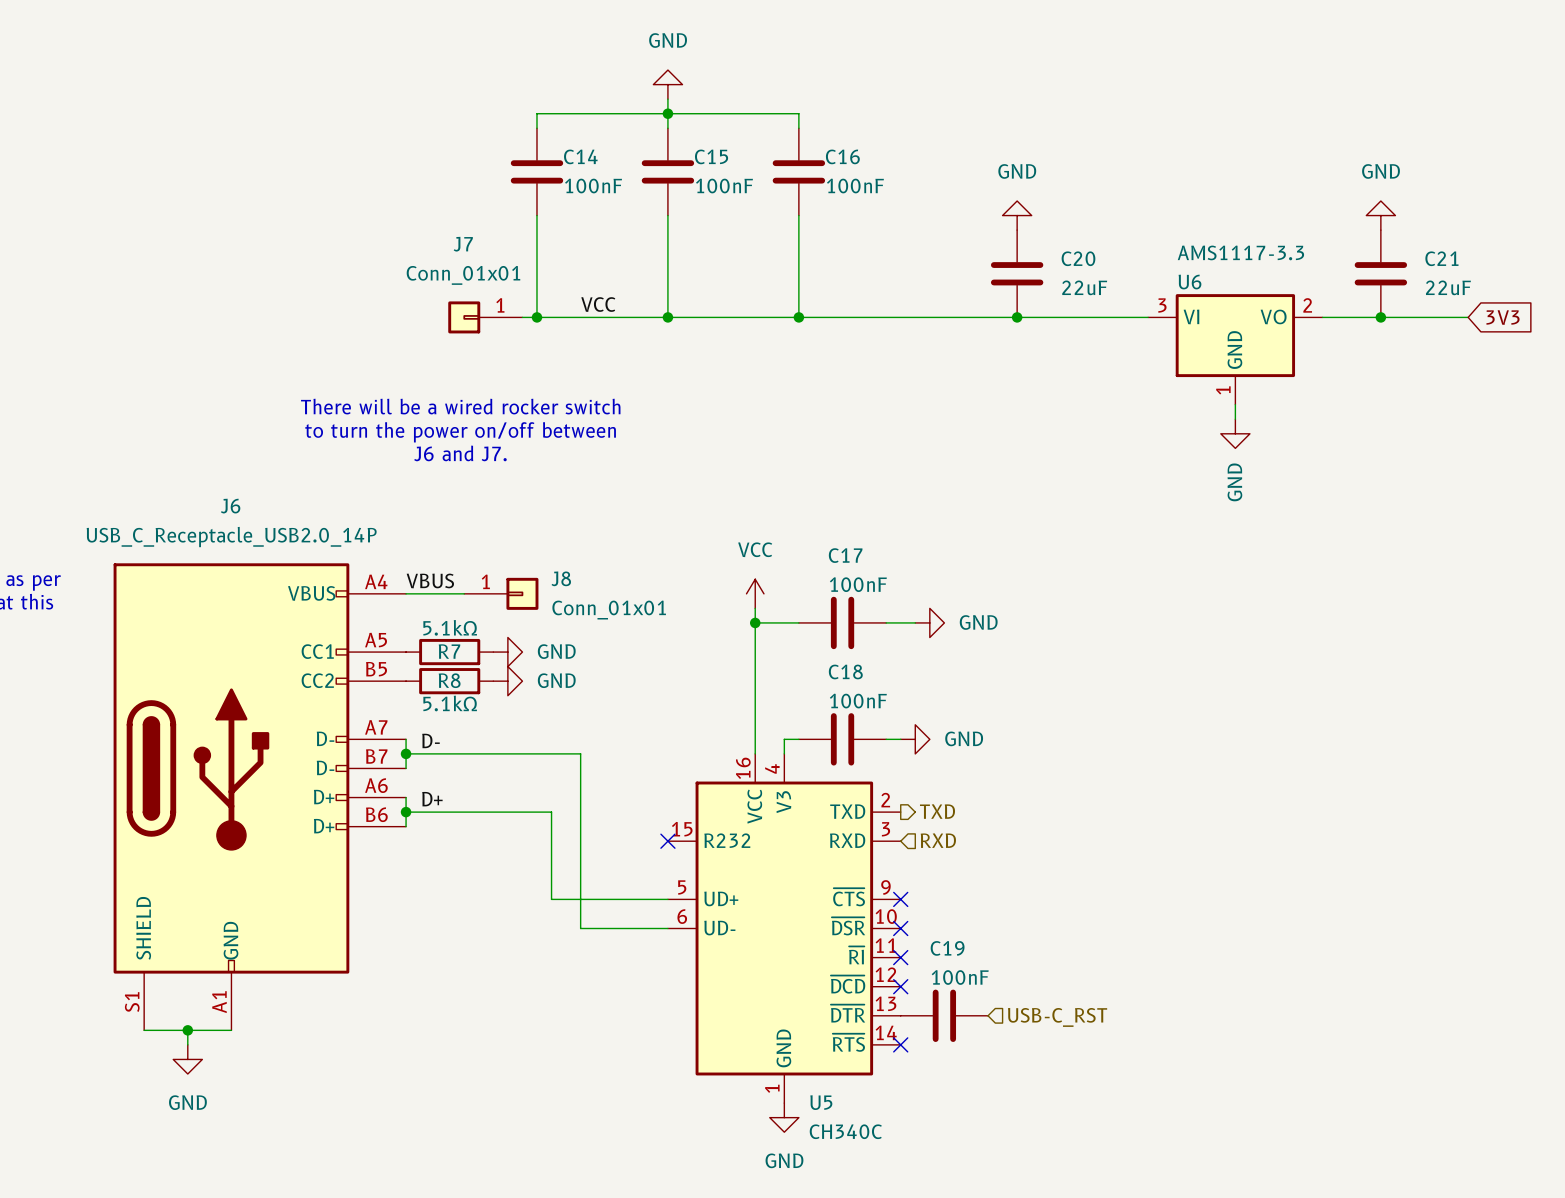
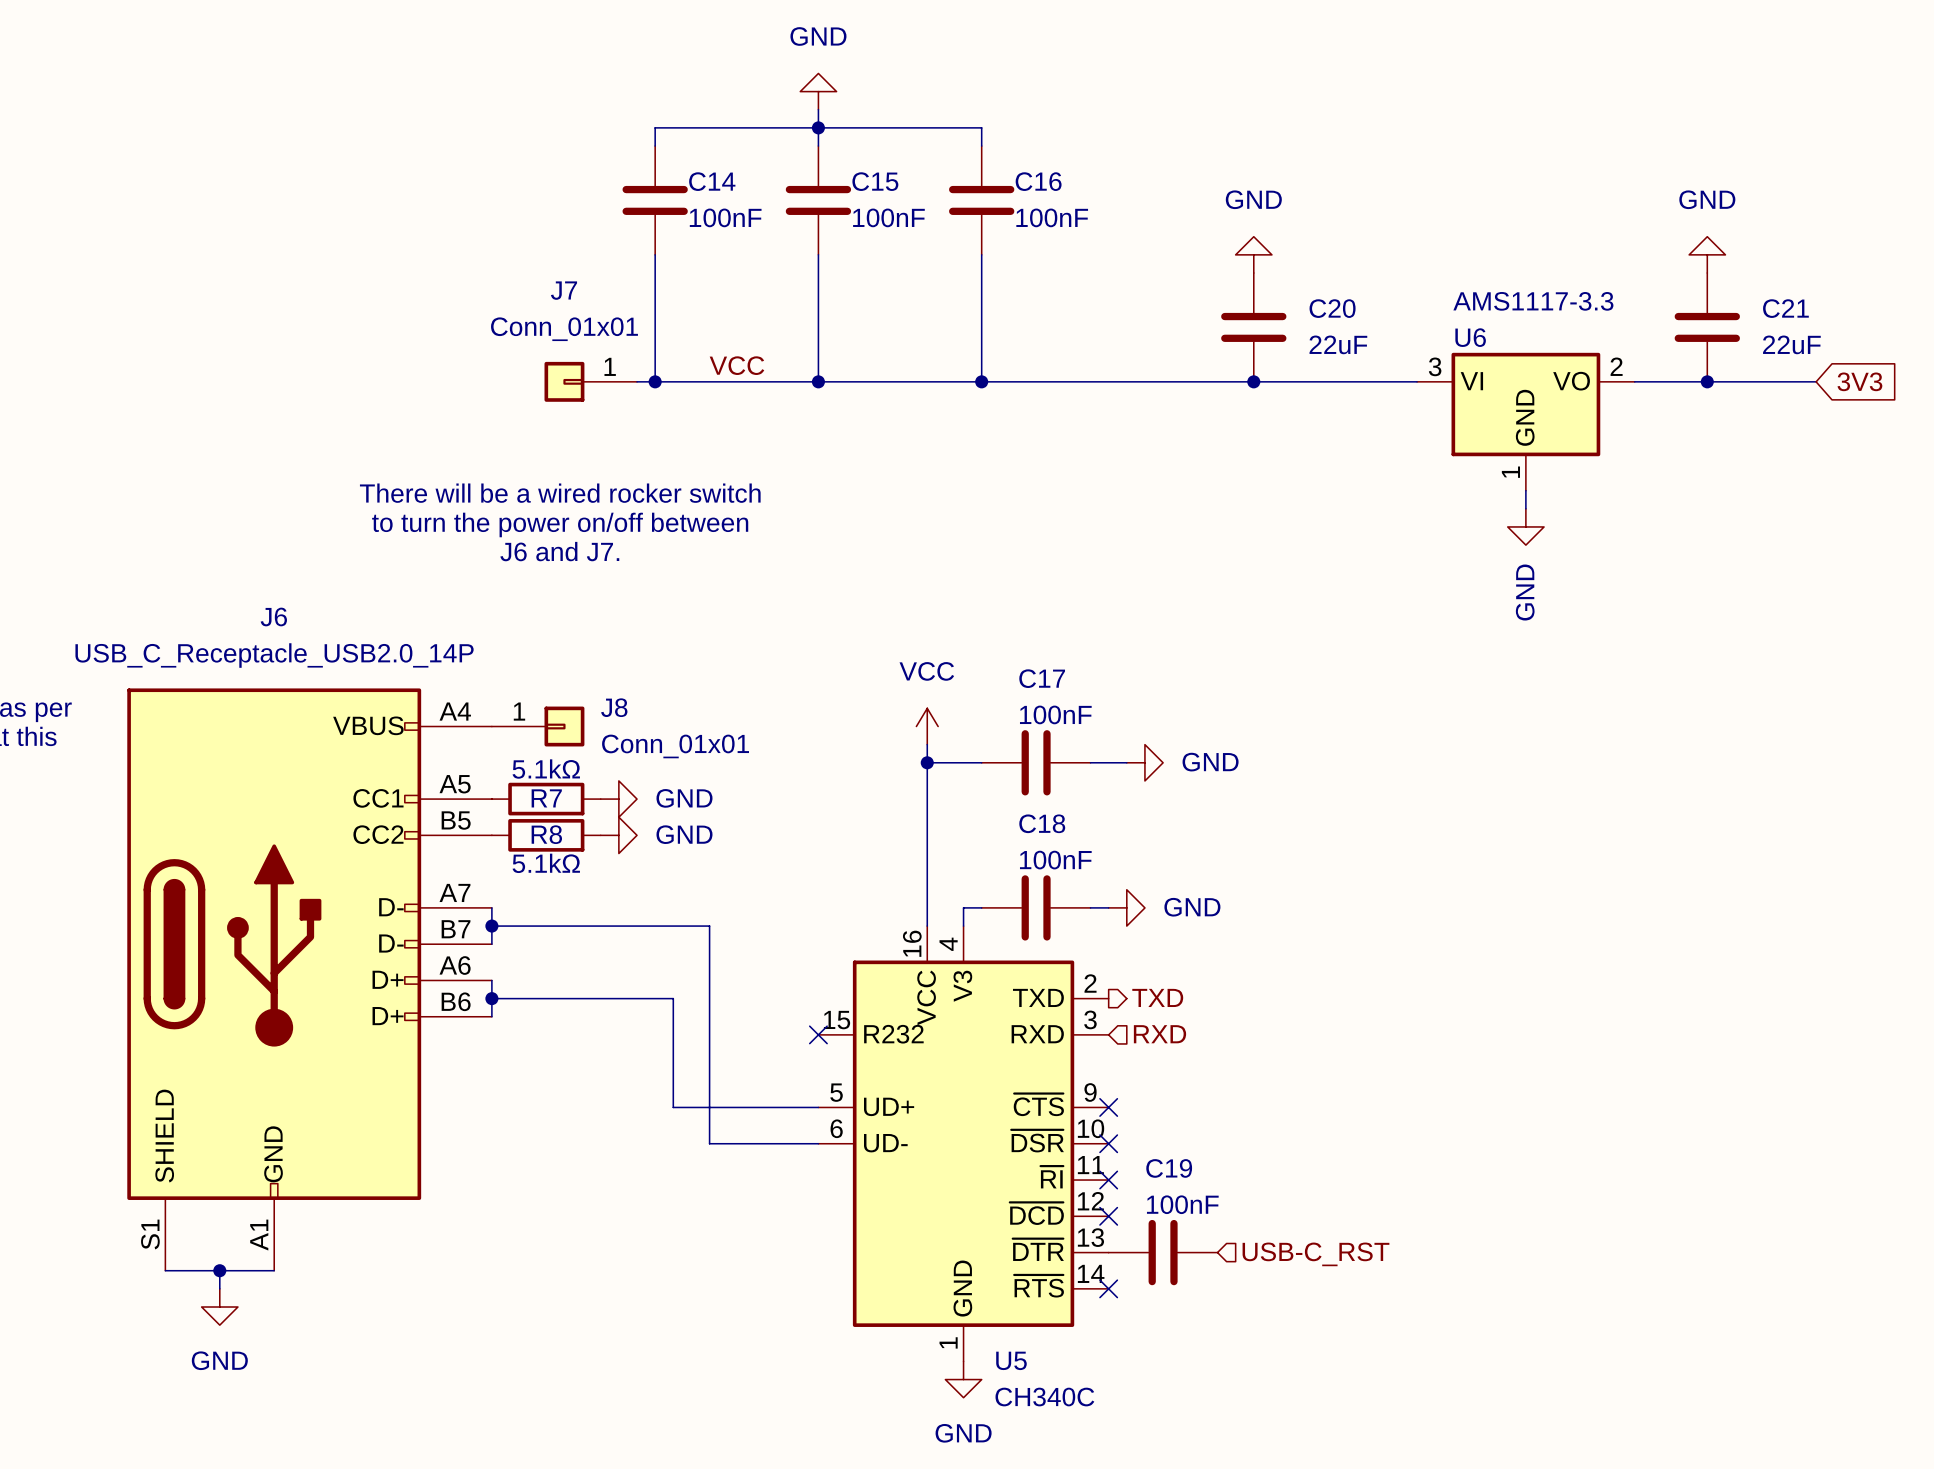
label: VBUS (430, 580) -> none
J8 position: (501, 593) -> (538, 726)
label: D- (430, 740) -> none
label: D+ (432, 799) -> none

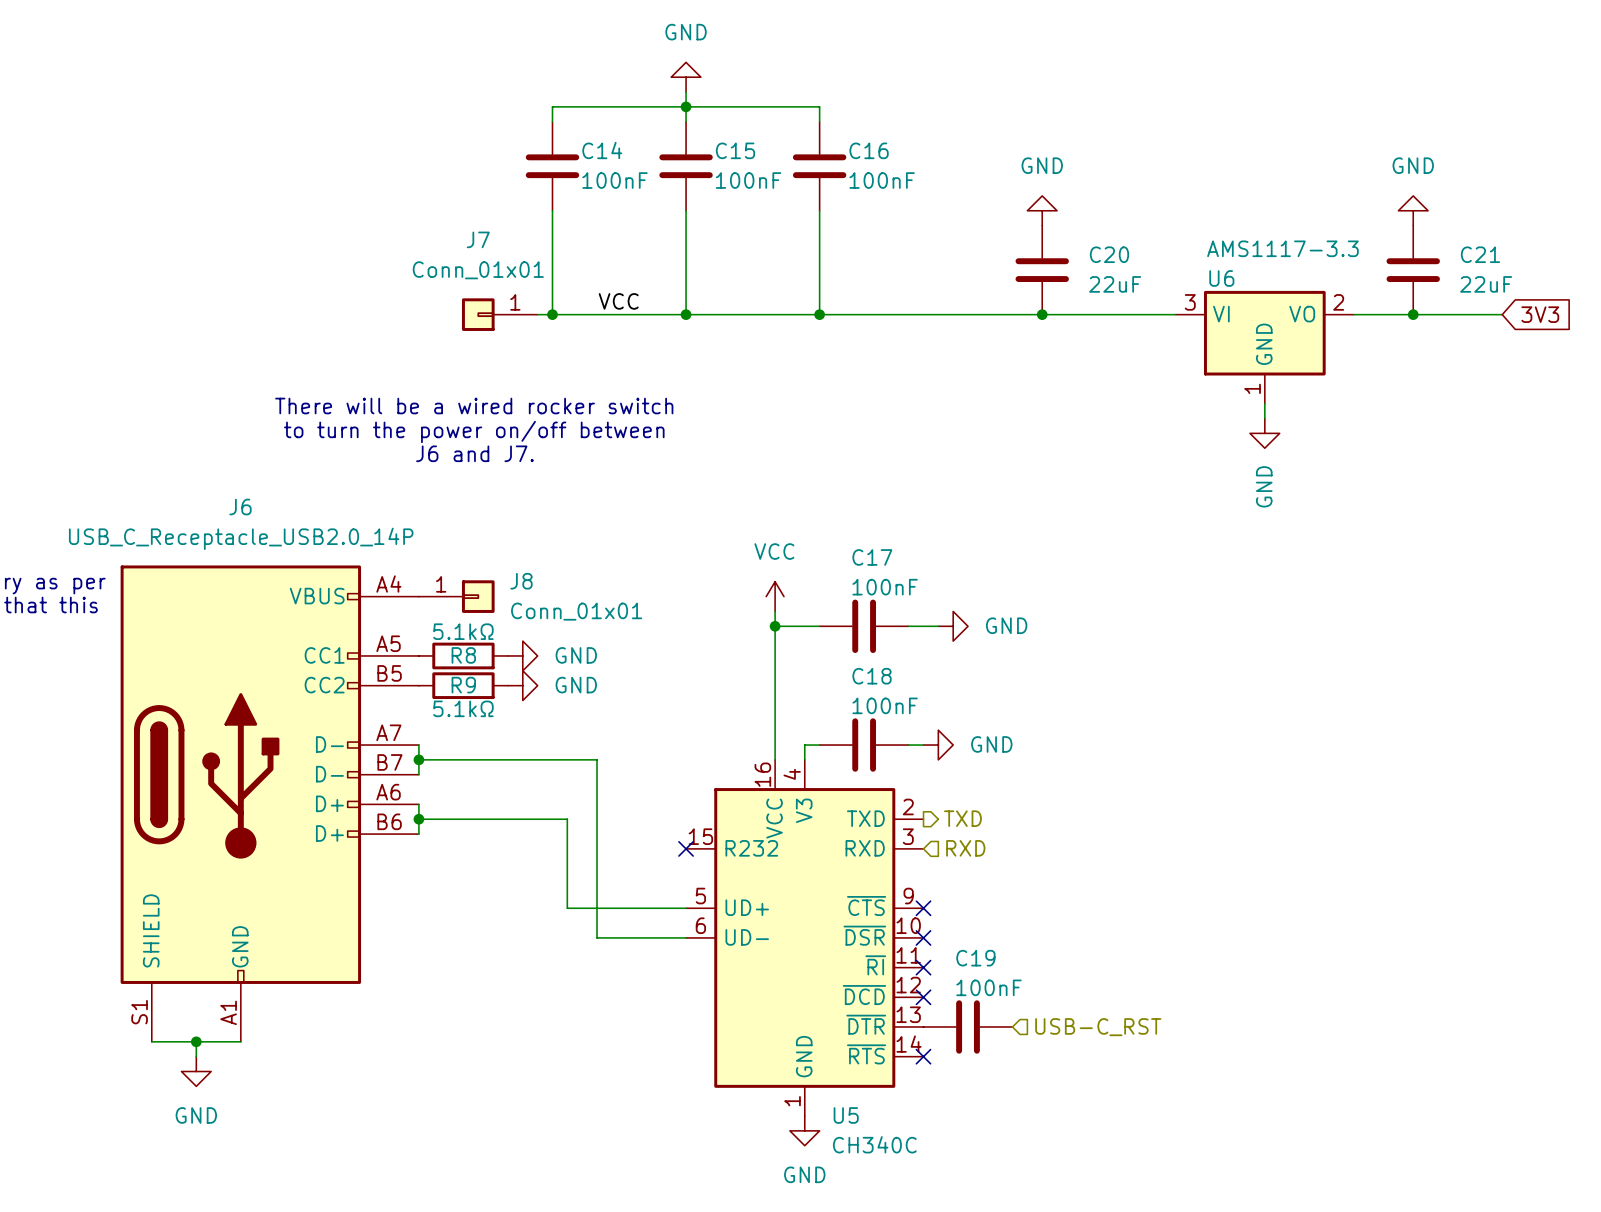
R7 name: R7 (546, 798) -> R8 (463, 655)
R8 name: R8 (546, 834) -> R9 (463, 685)

